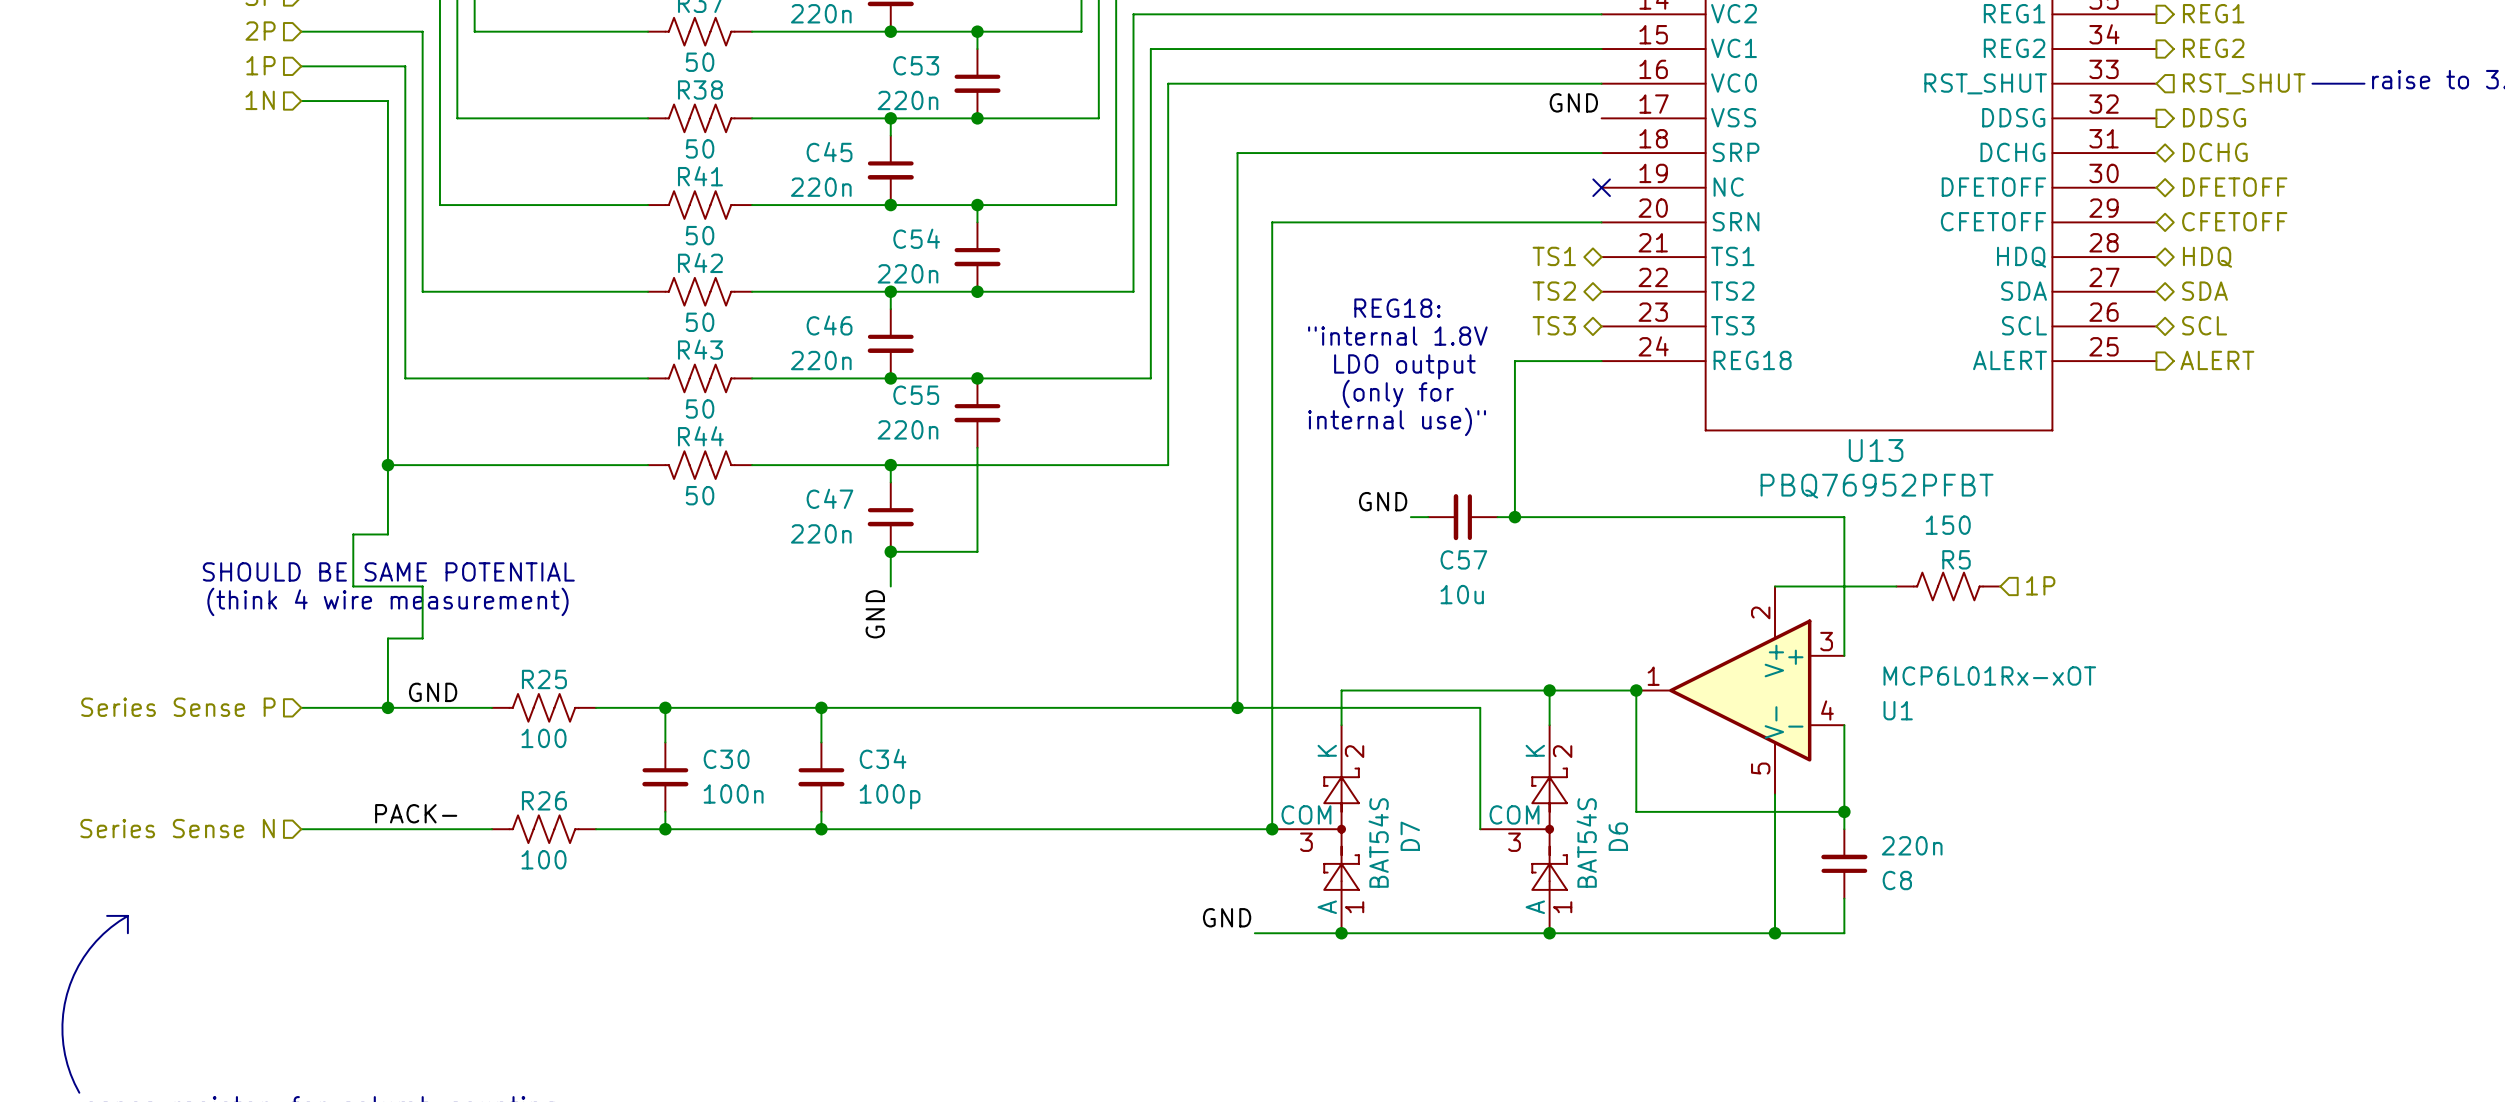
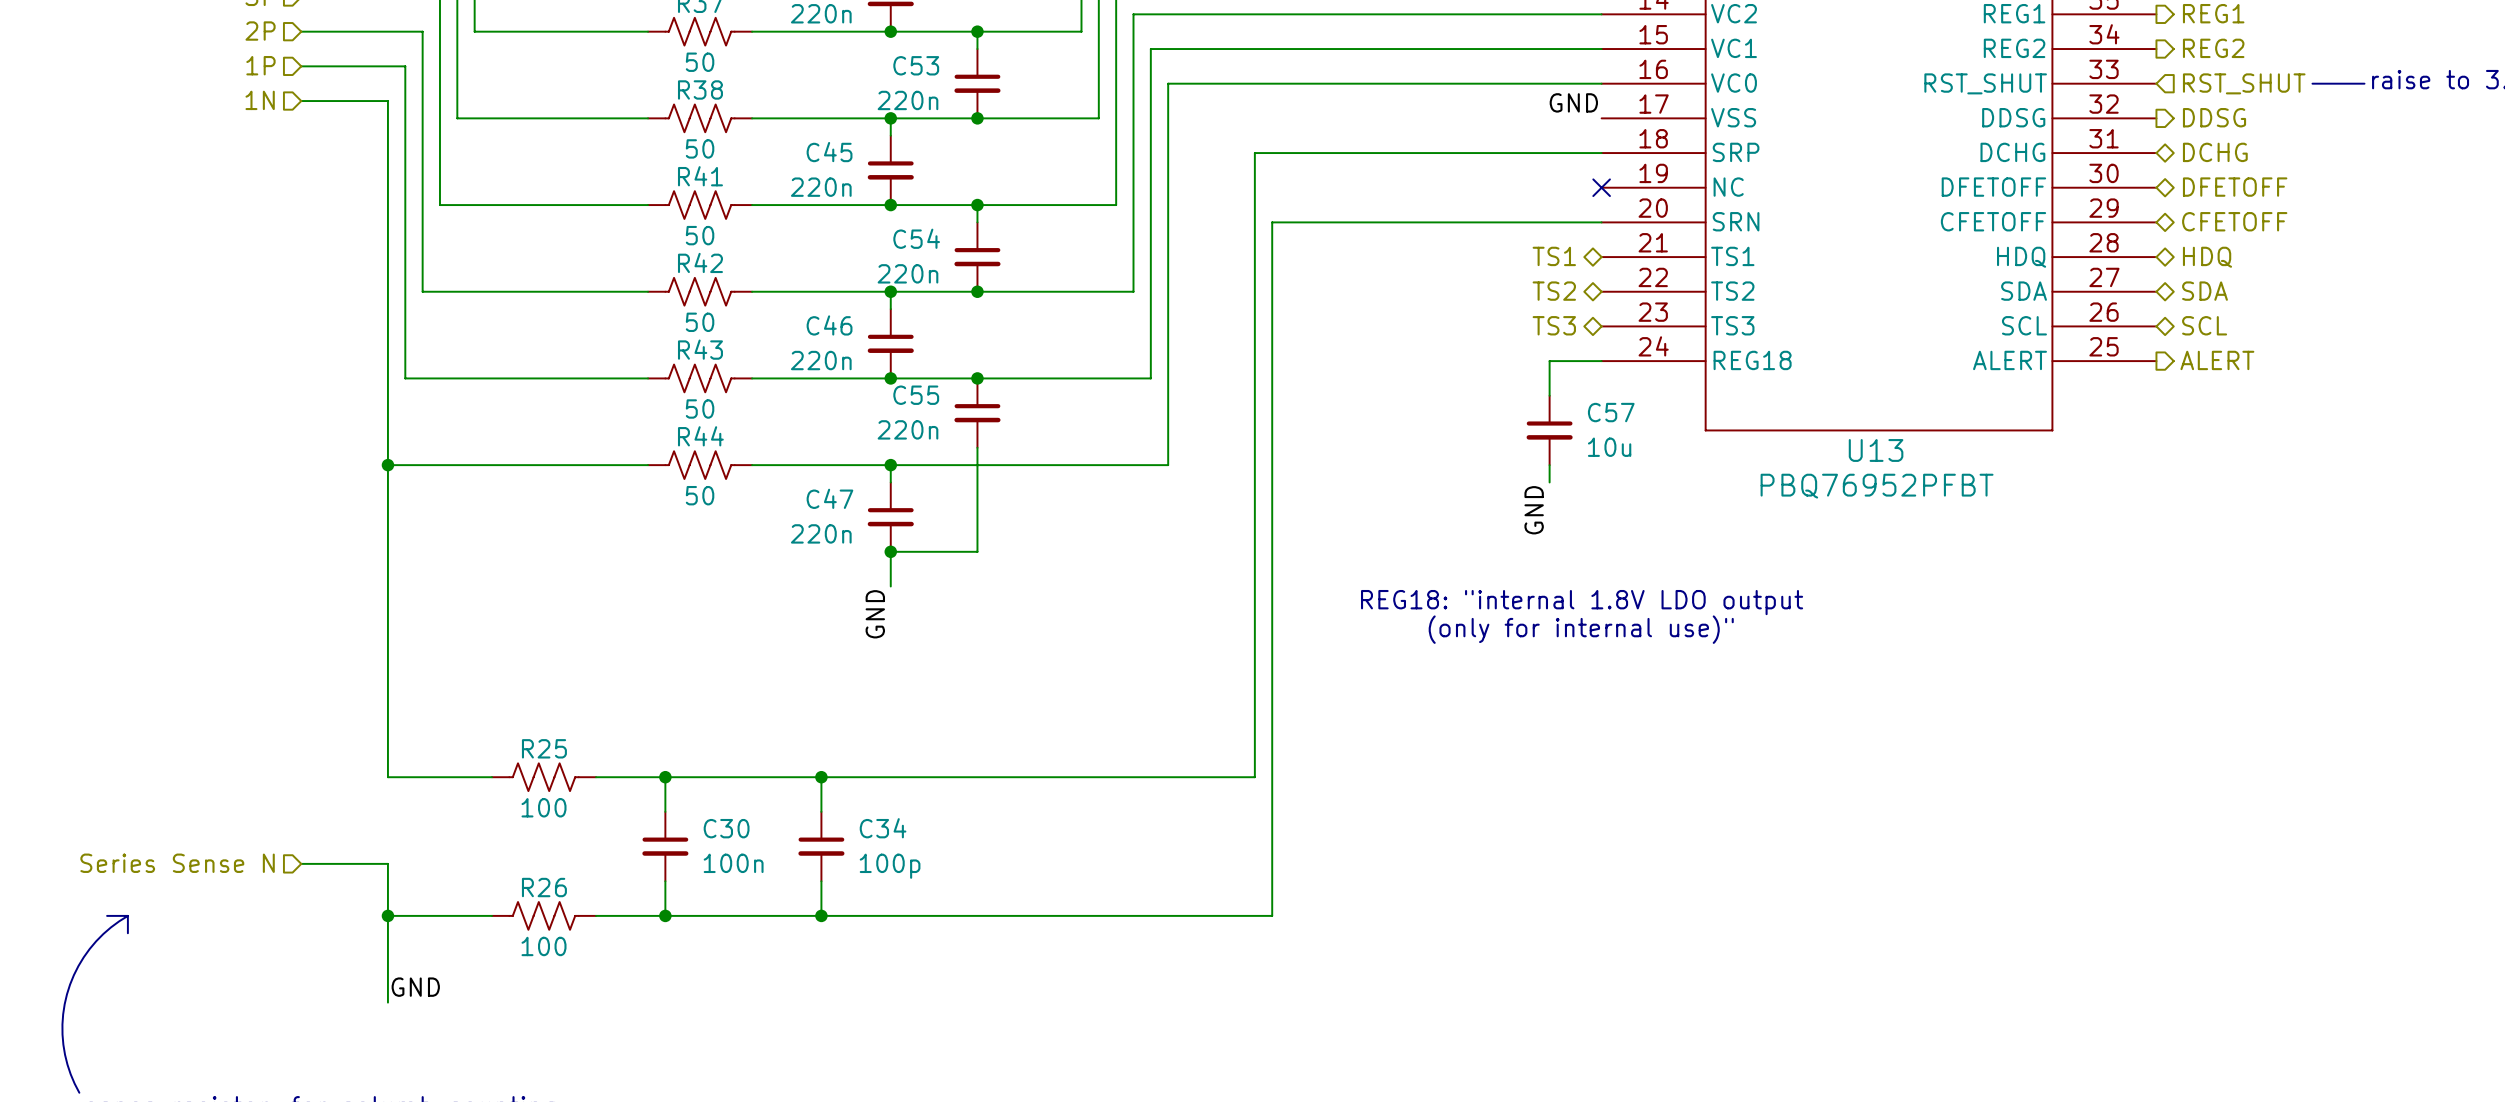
wire: (1254, 153) (1237, 153) (1237, 707) -> (1254, 153) (1254, 777) (596, 777)
text: REG18: (1397, 308) -> none
text: "internal 1.8V (1397, 336) -> none
wire: (1549, 361) (1514, 361) (1514, 517) -> (1549, 361) (1549, 395)
text: LDO output (1404, 366) -> none
text: (only for (1398, 393) -> none
text: internal use)" (1397, 421) -> none
R44 flip: as is (700, 465) -> left-right (700, 465)
wire: none -> (1549, 465) (1549, 482)
label rotation: 0° (1383, 501) -> 90° counterclockwise (1534, 510)
label position: GND (1383, 501) -> GND (1534, 510)
wire: (1410, 517) (1428, 517) -> none
C57 rotation: 0° (1462, 517) -> 90° counterclockwise (1549, 430)
C57 position: (1462, 517) -> (1549, 430)
wire: (1497, 517) (1844, 517) (1844, 655) -> none
junction: (1514, 517) -> none
wire: (387, 534) (353, 534) (353, 586) (422, 586) (422, 638) (387, 638) -> (387, 534) (387, 638)
text: SHOULD BE SAME POTENTIAL (388, 571) -> none
hierarchical label: 1P (2040, 585) -> none
wire: (1775, 586) (1896, 586) -> none
R5: 150 (1948, 586) -> none
text: (think 4 wire measurement) (387, 601) -> none
text: none -> REG18: "internal 1.8V LDO output (1582, 602)
text: none -> (only for internal use)" (1581, 629)
wire: (1549, 690) (1549, 725) -> none
junction: (1549, 690) -> none
junction: (1636, 690) -> none
U1: MCP6L01Rx-xOT (1740, 690) -> none
label position: GND (433, 692) -> GND (415, 987)
hierarchical label: Series Sense P (178, 707) -> none
wire: (301, 707) (492, 707) -> none
wire: none -> (387, 707) (387, 777) (492, 777)
junction: (387, 707) -> none
R25 position: (544, 707) -> (544, 777)
wire: (596, 707) (1480, 707) (1480, 829) -> none
wire: (665, 707) (665, 742) -> (665, 881) (665, 915)
junction: (665, 707) -> none
wire: (821, 707) (821, 742) -> (821, 881) (821, 915)
junction: (821, 707) -> none
junction: (1237, 707) -> none
wire: (1341, 725) (1341, 690) (1636, 690) (1636, 811) (1844, 811) -> none
wire: (1844, 725) (1844, 829) -> none
junction: none -> (665, 777)
C30 position: (665, 777) -> (665, 846)
junction: none -> (821, 777)
C34 position: (821, 777) -> (821, 846)
wire: (1775, 794) (1775, 933) -> none
junction: (1844, 811) -> none
label: PACK- (416, 813) -> none
hierarchical label position: Series Sense N (177, 828) -> Series Sense N (177, 863)
wire: (301, 829) (492, 829) -> none
R26 position: (544, 829) -> (544, 915)
wire: (596, 829) (1272, 829) -> (596, 915) (1272, 915) (1272, 829)
junction: (665, 829) -> none
junction: (821, 829) -> none
junction: (1272, 829) -> none
D7: BAT54S (1315, 829) -> none
D6: BAT54S (1523, 829) -> none
wire: none -> (301, 863) (387, 863) (387, 1002)
C8: 220n (1844, 863) -> none
wire: (1844, 898) (1844, 933) (1254, 933) -> none
wire: none -> (387, 915) (492, 915)
junction: none -> (387, 915)
junction: none -> (665, 915)
junction: none -> (821, 915)
label: GND (1227, 917) -> none
junction: (1341, 933) -> none
junction: (1549, 933) -> none
junction: (1775, 933) -> none

